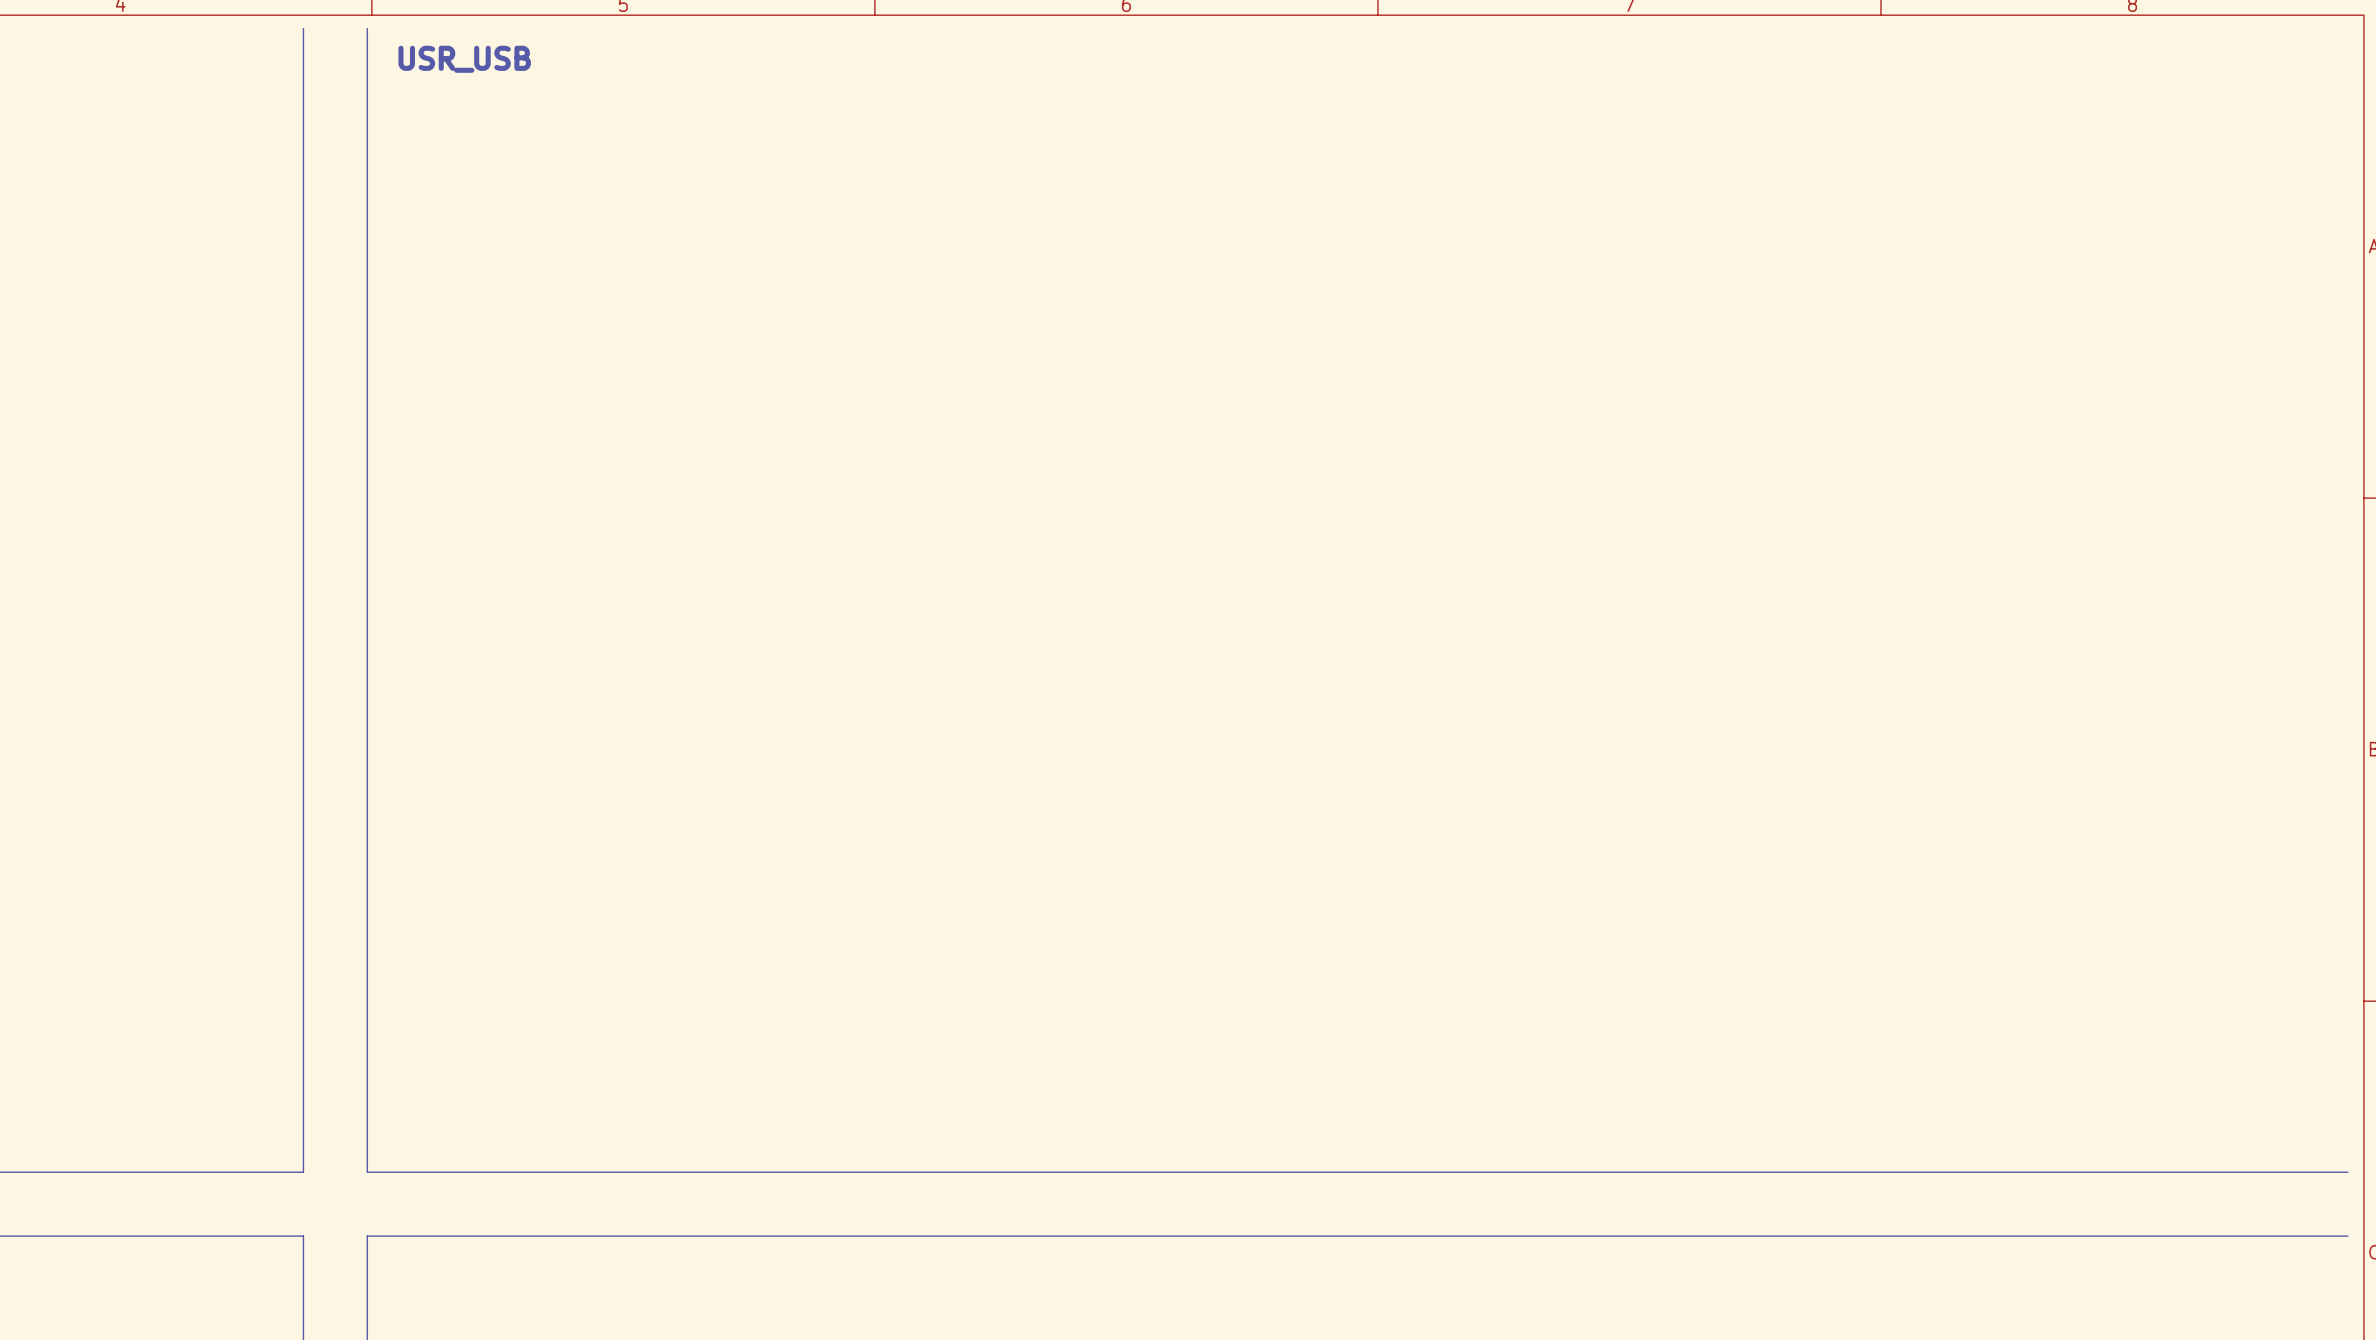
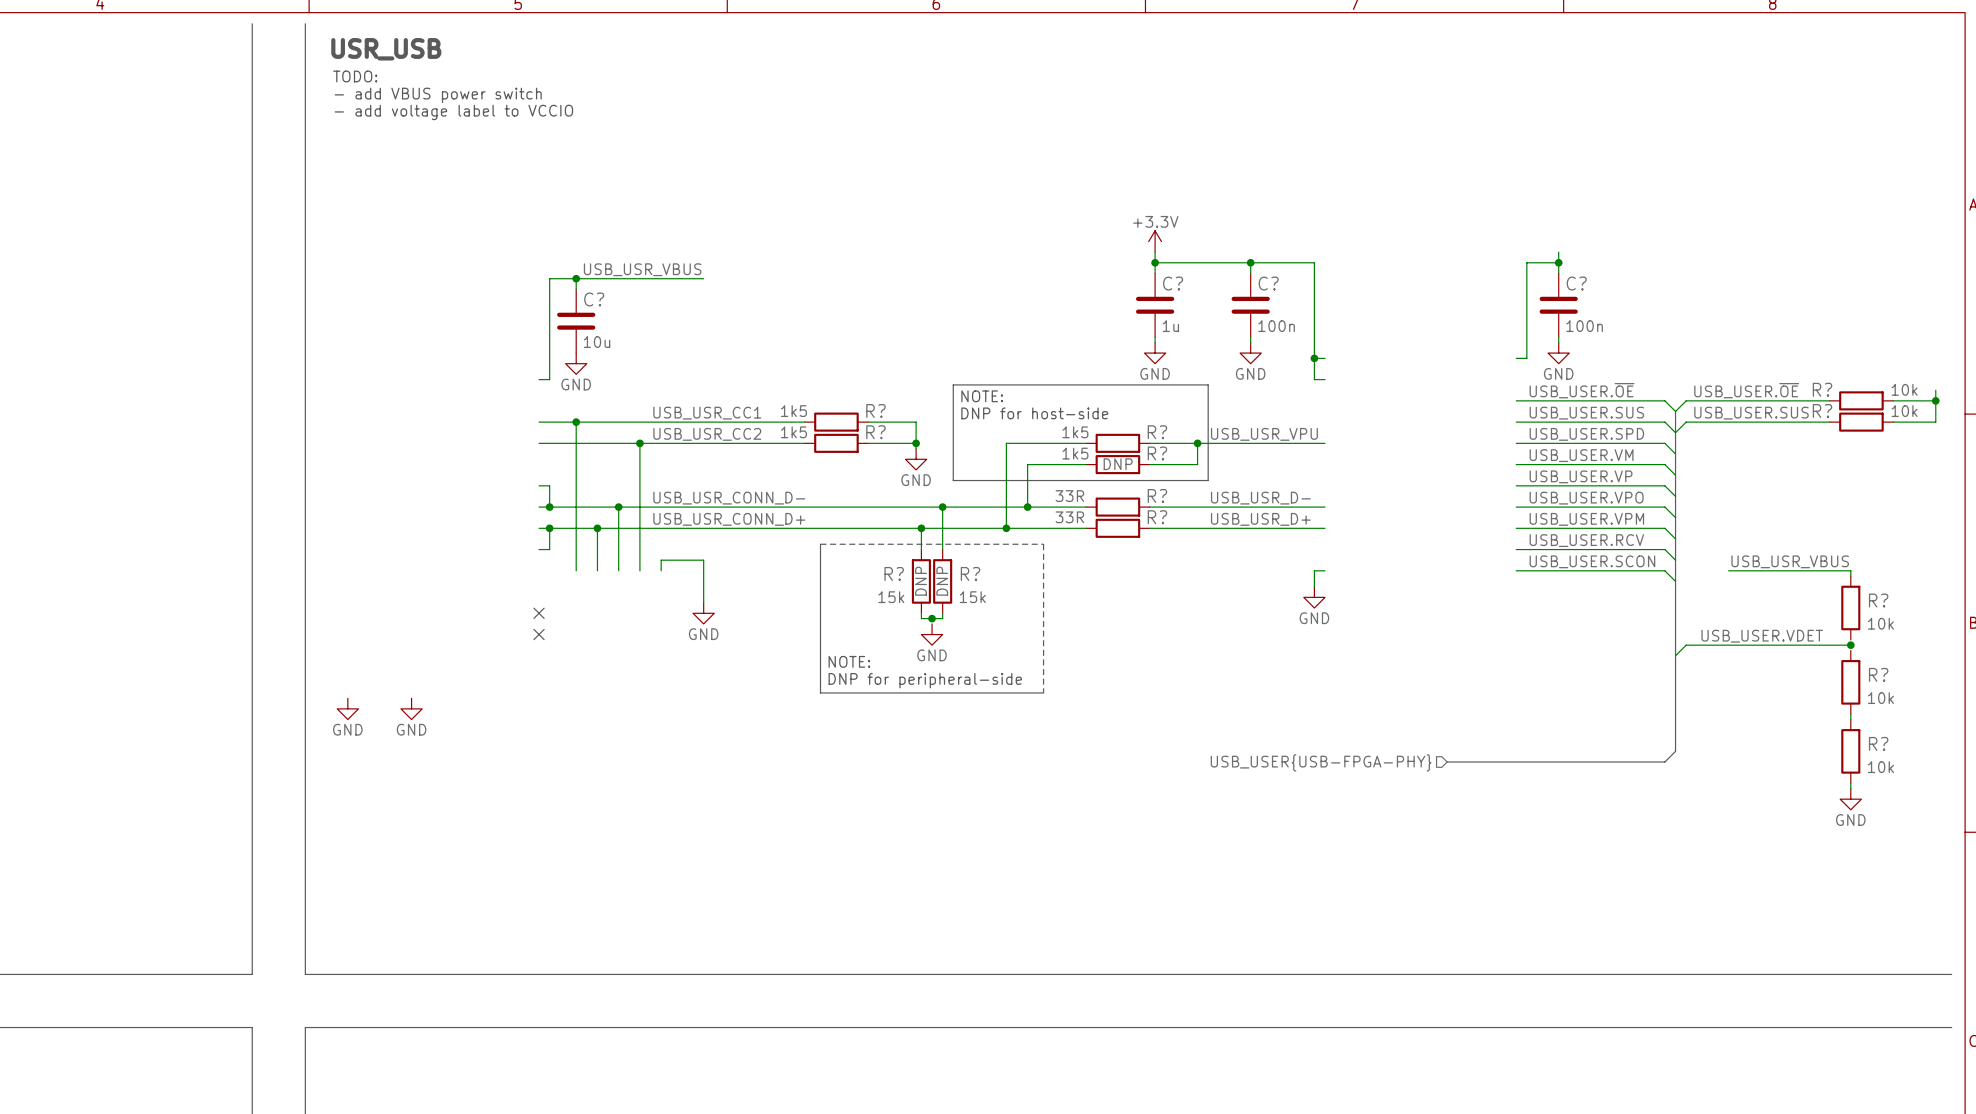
text: none -> TODO: (355, 76)
text: none -> - add VBUS power switch (438, 95)
text: none -> - add voltage label to VCCIO (453, 112)
power symbol: none -> +3.3V (1155, 241)
wire: none -> (1155, 252) (1155, 273)
wire: none -> (1558, 252) (1558, 273)
wire: none -> (1155, 262) (1314, 262) (1314, 379) (1325, 379)
junction: none -> (1155, 262)
wire: none -> (1250, 262) (1250, 273)
junction: none -> (1250, 262)
wire: none -> (1558, 262) (1526, 262) (1526, 358) (1516, 358)
junction: none -> (1558, 262)
label: none -> USB_USR_VBUS (642, 269)
wire: none -> (576, 278) (576, 289)
junction: none -> (576, 278)
wire: none -> (703, 278) (549, 278) (549, 379) (539, 379)
C?: none -> (1155, 305)
C?: none -> (1250, 305)
C?: none -> (1558, 305)
C?: none -> (576, 321)
wire: none -> (1155, 337) (1155, 342)
wire: none -> (1250, 337) (1250, 342)
wire: none -> (1558, 337) (1558, 342)
power symbol: none -> GND (1155, 353)
power symbol: none -> GND (1250, 353)
power symbol: none -> GND (1558, 353)
wire: none -> (1314, 358) (1325, 358)
junction: none -> (1314, 358)
power symbol: none -> GND (576, 363)
line: none -> (953, 384) (953, 480) (1208, 480) (1208, 384) (953, 384)
label: none -> USB_USER.~{OE} (1582, 390)
label: none -> USB_USER.~{OE} (1746, 390)
wire: none -> (1935, 390) (1935, 422) (1893, 422)
text: none -> NOTE: (982, 396)
wire: none -> (1516, 400) (1664, 400) (1675, 411) (1686, 400) (1829, 400)
R?: none -> (1861, 400)
wire: none -> (1893, 400) (1935, 400)
junction: none -> (1935, 400)
bus: none -> (1675, 411) (1675, 751) (1664, 762) (1447, 762)
label: none -> USB_USR_CC1 (707, 413)
label: none -> USB_USER.SUS (1586, 413)
label: none -> USB_USER.SUS (1751, 413)
text: none -> DNP for host-side (1034, 413)
wire: none -> (539, 422) (804, 422)
wire: none -> (576, 422) (576, 570)
junction: none -> (576, 422)
R?: none -> (836, 422)
wire: none -> (868, 422) (916, 422) (916, 448)
wire: none -> (1516, 422) (1664, 422) (1675, 432) (1686, 422) (1829, 422)
R?: none -> (1861, 422)
label: none -> USB_USR_CC2 (707, 434)
label: none -> USB_USR_VPU (1264, 434)
label: none -> USB_USER.SPD (1586, 434)
wire: none -> (539, 443) (804, 443)
wire: none -> (639, 443) (639, 570)
junction: none -> (639, 443)
R?: none -> (836, 443)
wire: none -> (868, 443) (916, 443)
junction: none -> (916, 443)
wire: none -> (1086, 443) (1006, 443) (1006, 528)
R?: none -> (1117, 443)
wire: none -> (1149, 443) (1325, 443)
wire: none -> (1197, 443) (1197, 464) (1149, 464)
junction: none -> (1197, 443)
wire: none -> (1516, 443) (1664, 443) (1675, 453)
label: none -> USB_USER.VM (1581, 455)
power symbol: none -> GND (916, 459)
wire: none -> (1086, 464) (1027, 464) (1027, 507)
R?: none -> (1117, 464)
wire: none -> (1516, 464) (1664, 464) (1675, 475)
label: none -> USB_USER.VP (1581, 476)
wire: none -> (539, 485) (549, 485) (549, 507)
wire: none -> (1516, 485) (1664, 485) (1675, 496)
label: none -> USB_USR_CONN_D- (729, 498)
label: none -> USB_USR_D- (1260, 498)
label: none -> USB_USER.VPO (1586, 498)
wire: none -> (539, 507) (1086, 507)
junction: none -> (549, 507)
wire: none -> (618, 507) (618, 570)
junction: none -> (618, 507)
wire: none -> (942, 507) (942, 549)
junction: none -> (942, 507)
junction: none -> (1027, 507)
R?: none -> (1117, 507)
wire: none -> (1149, 507) (1325, 507)
wire: none -> (1516, 507) (1664, 507) (1675, 517)
label: none -> USB_USR_CONN_D+ (729, 519)
label: none -> USB_USR_D+ (1260, 519)
label: none -> USB_USER.VPM (1586, 519)
wire: none -> (539, 528) (1086, 528)
wire: none -> (549, 528) (549, 549) (539, 549)
junction: none -> (549, 528)
wire: none -> (597, 528) (597, 570)
junction: none -> (597, 528)
wire: none -> (921, 528) (921, 549)
junction: none -> (921, 528)
junction: none -> (1006, 528)
R?: none -> (1117, 528)
wire: none -> (1149, 528) (1325, 528)
wire: none -> (1516, 528) (1664, 528) (1675, 538)
label: none -> USB_USER.RCV (1586, 540)
line: none -> (820, 544) (820, 692) (1043, 692) (1043, 544) (820, 544)
wire: none -> (1516, 549) (1664, 549) (1675, 560)
label: none -> USB_USER.SCON (1592, 561)
label: none -> USB_USR_VBUS (1790, 561)
wire: none -> (661, 570) (661, 560) (703, 560) (703, 602)
wire: none -> (1325, 570) (1314, 570) (1314, 586)
wire: none -> (1516, 570) (1664, 570) (1675, 581)
wire: none -> (1728, 570) (1850, 570) (1850, 576)
R?: none -> (921, 581)
R?: none -> (942, 581)
power symbol: none -> GND (1314, 597)
R?: none -> (1850, 607)
no-connect mark: none -> (539, 613)
power symbol: none -> GND (703, 613)
wire: none -> (921, 613) (921, 618) (942, 618) (942, 613)
junction: none -> (932, 618)
no-connect mark: none -> (539, 634)
power symbol: none -> GND (932, 634)
label: none -> USB_USER.VDET (1762, 636)
wire: none -> (1850, 645) (1686, 645) (1675, 655)
junction: none -> (1850, 645)
text: none -> NOTE: (849, 661)
text: none -> DNP for peripheral-side (925, 680)
R?: none -> (1850, 682)
power symbol: none -> GND (347, 708)
power symbol: none -> GND (411, 708)
wire: none -> (1850, 714) (1850, 719)
R?: none -> (1850, 751)
hierarchical label: none -> USB_USER{USB-FPGA-PHY} (1321, 762)
wire: none -> (1850, 783) (1850, 788)
power symbol: none -> GND (1850, 799)

